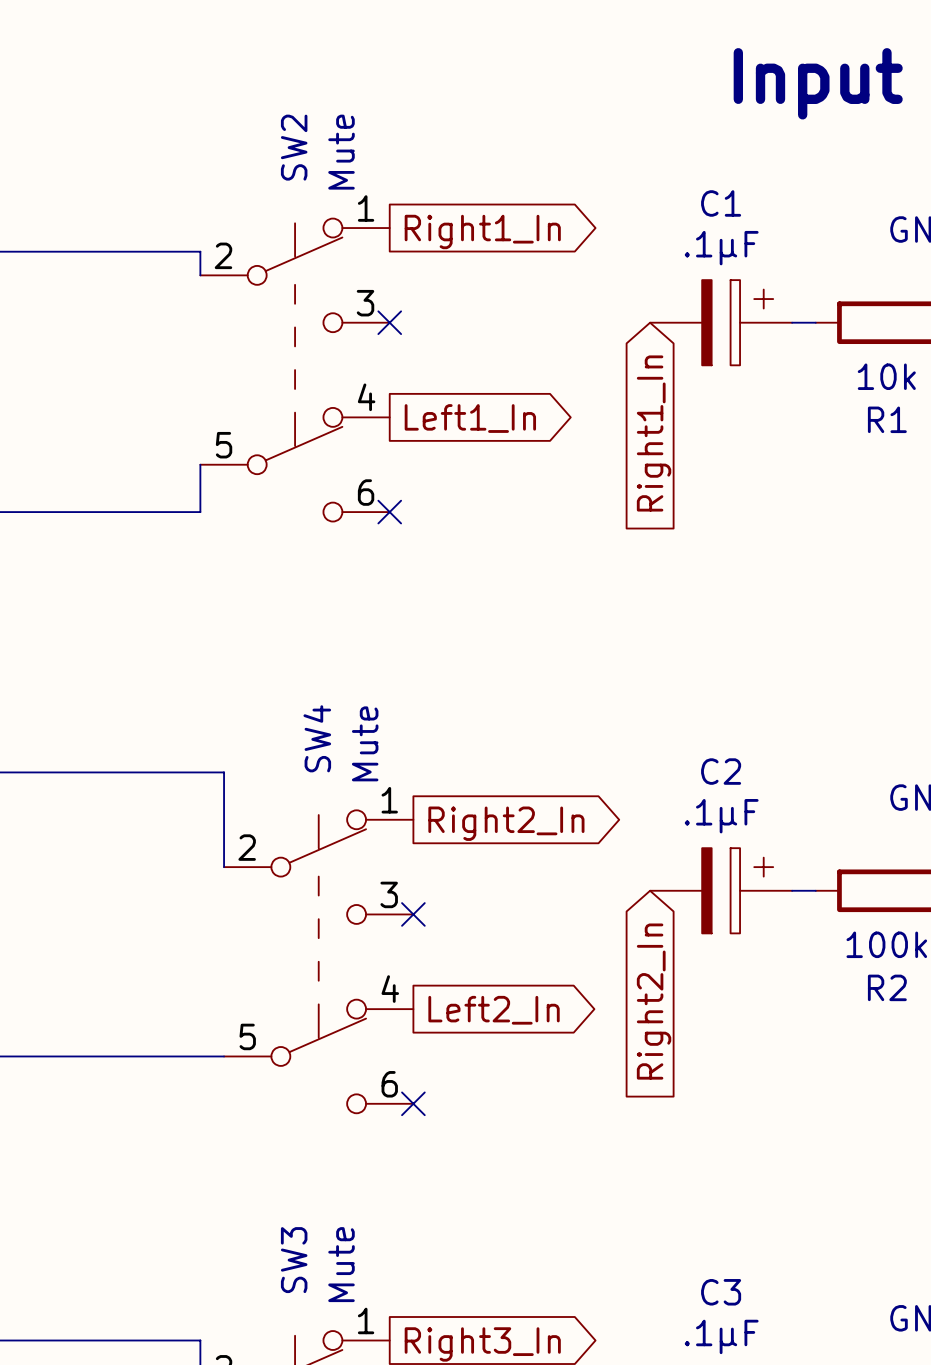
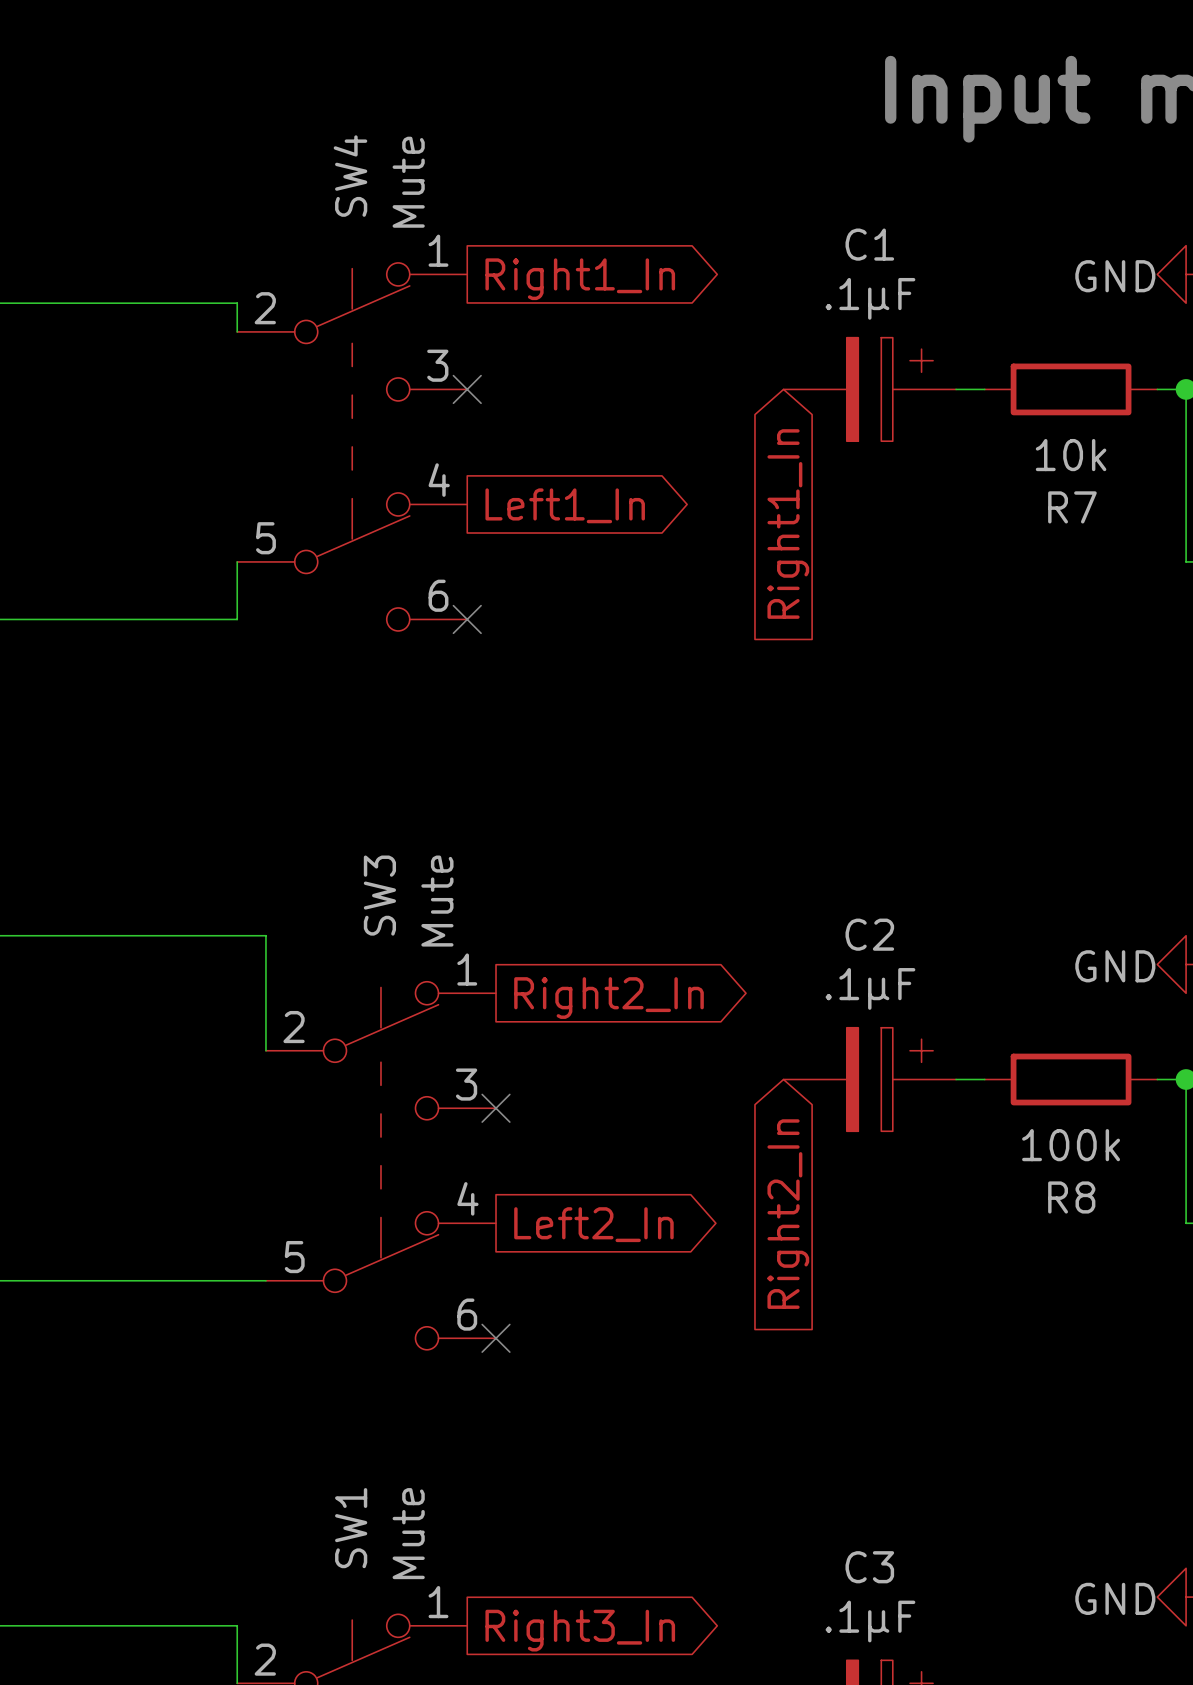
SW2 name: SW2 (294, 147) -> SW4 (350, 176)
R1 name: R1 (887, 419) -> R7 (1072, 507)
SW4 name: SW4 (317, 738) -> SW3 (379, 895)
R2 name: R2 (887, 987) -> R8 (1071, 1197)
SW3 name: SW3 (294, 1260) -> SW1 (351, 1528)

